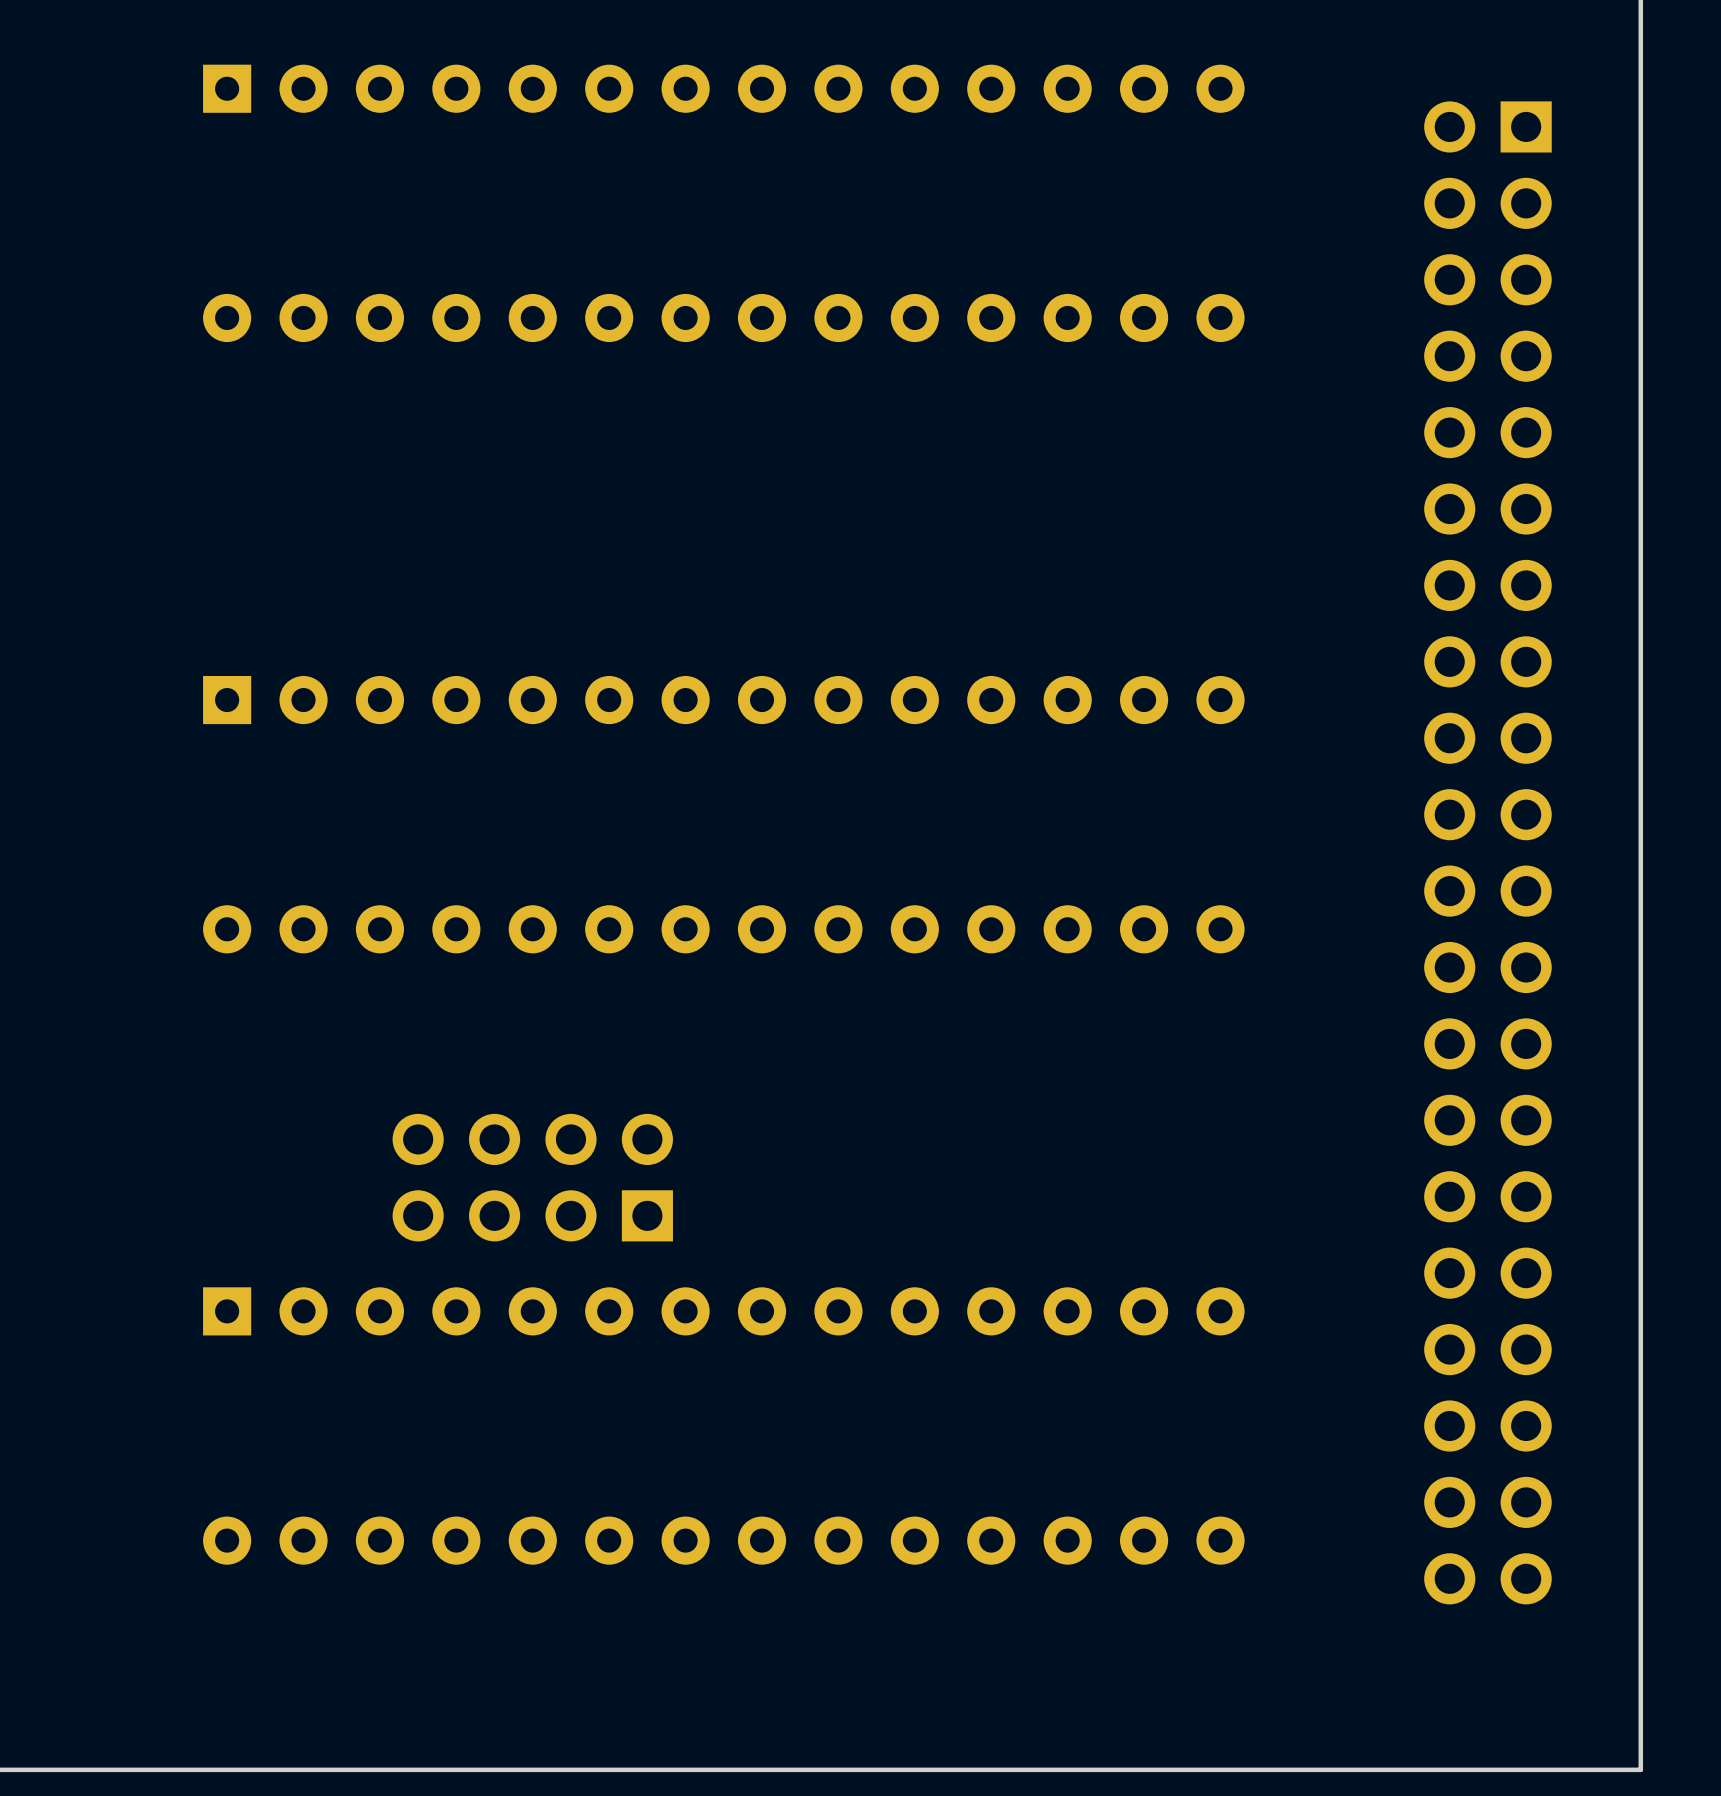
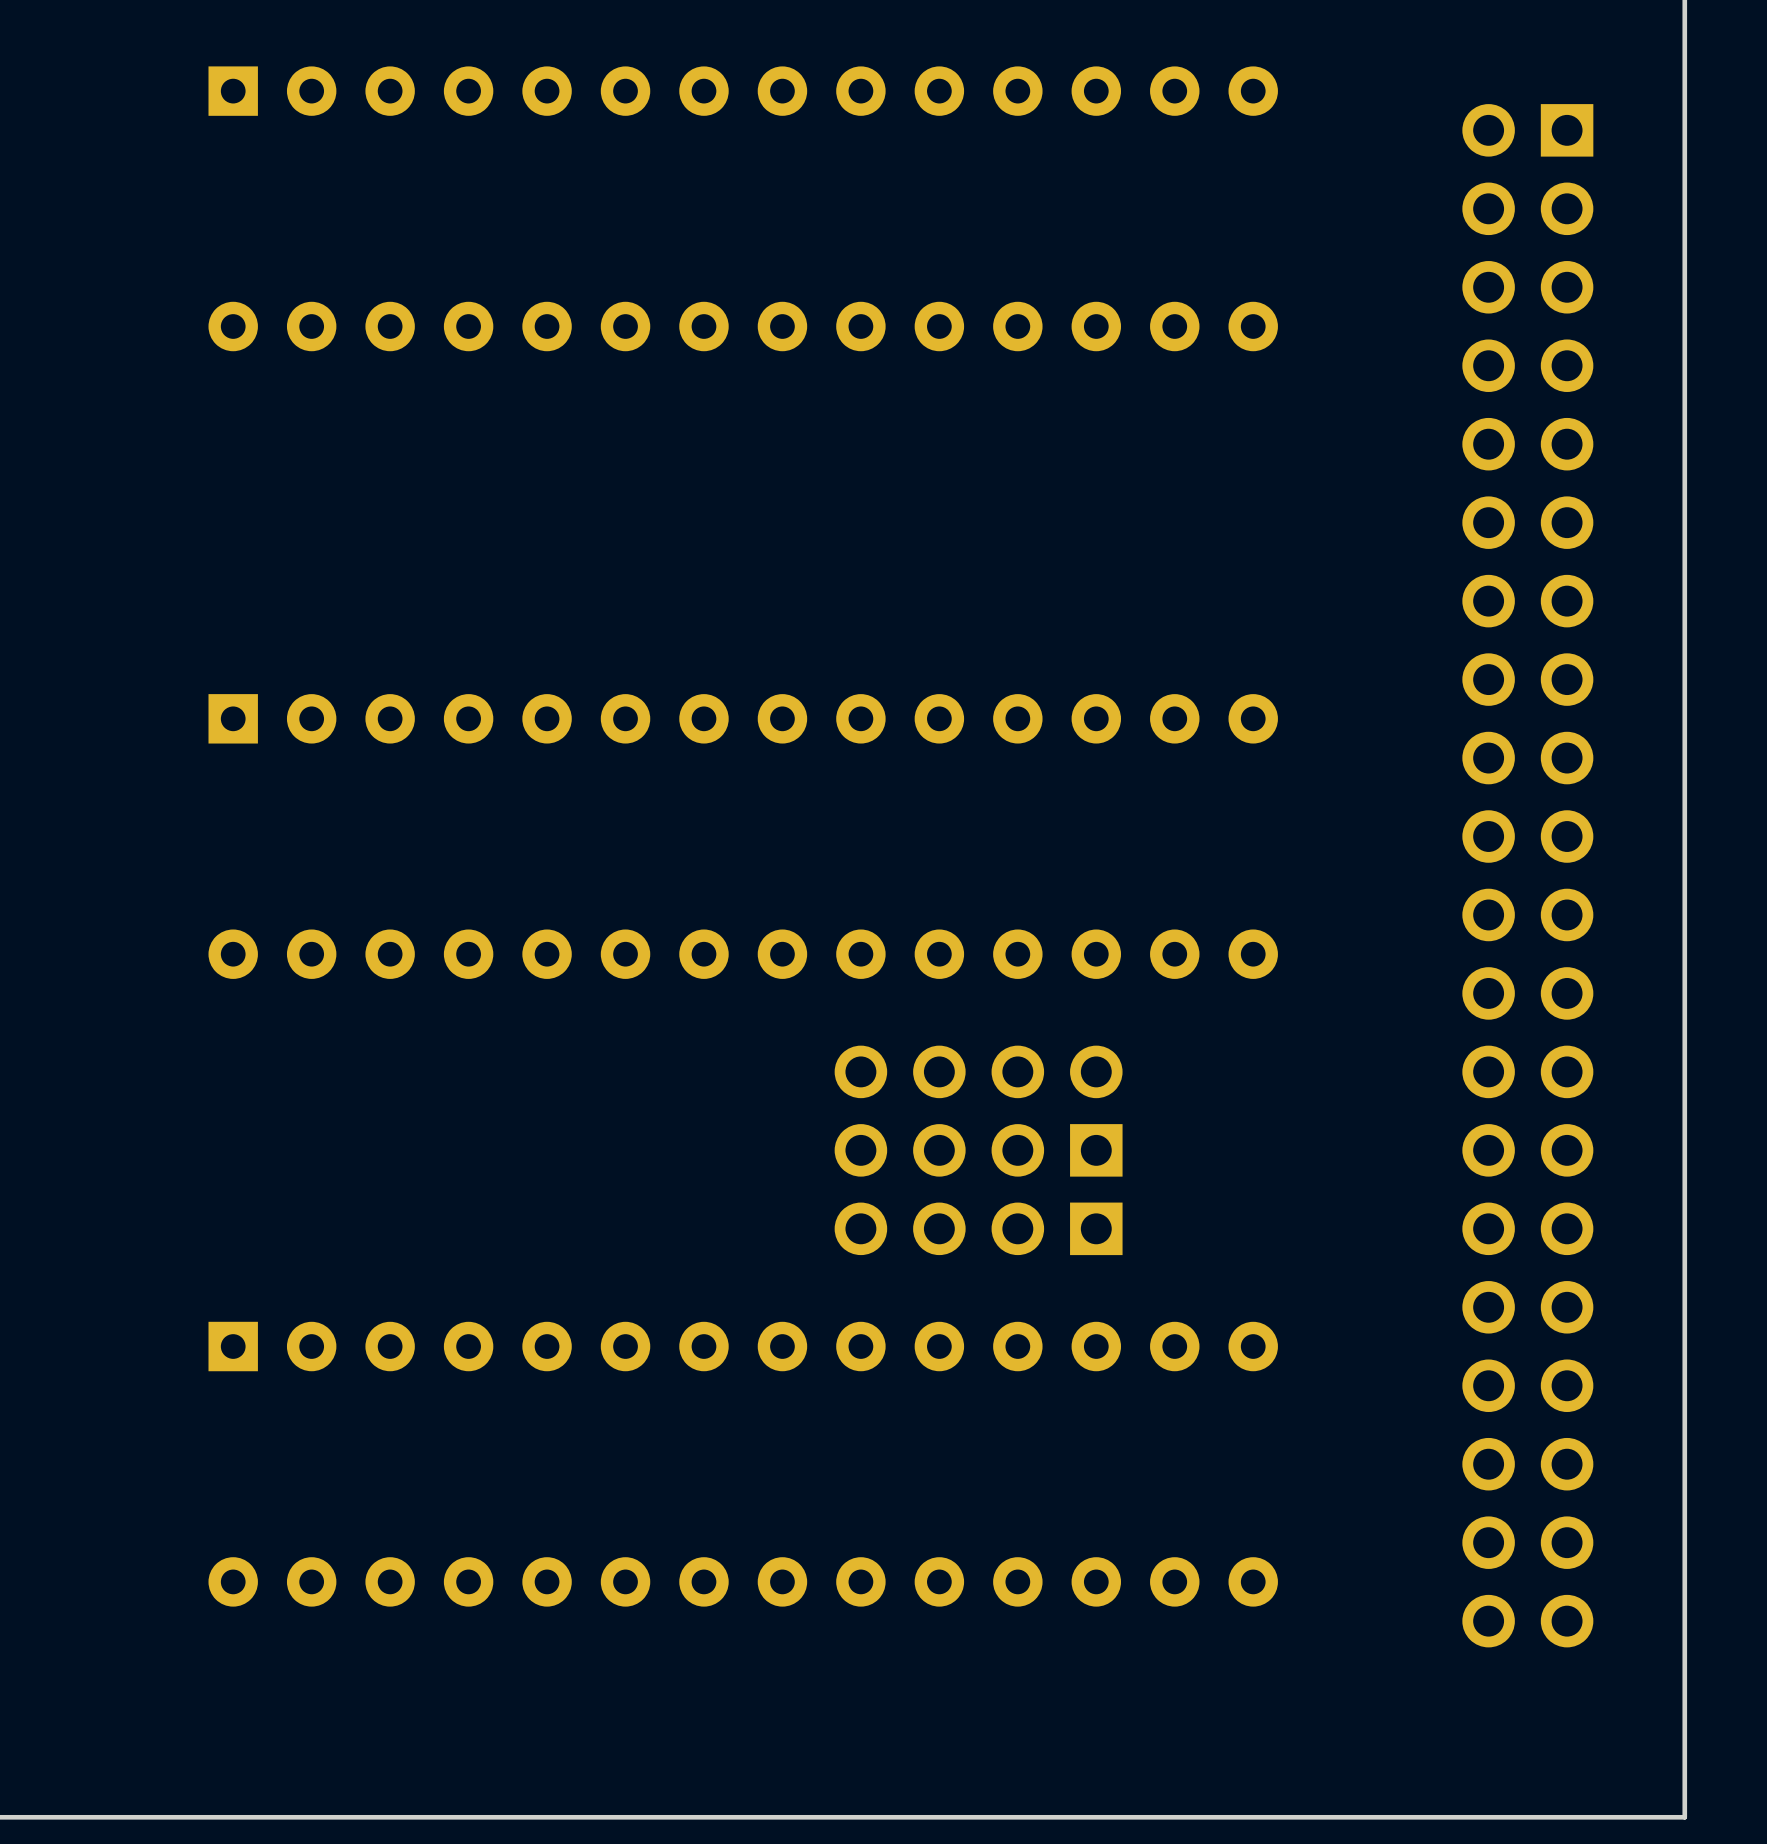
part position: (532, 1177) -> (978, 1111)
part: none -> (978, 1228)

